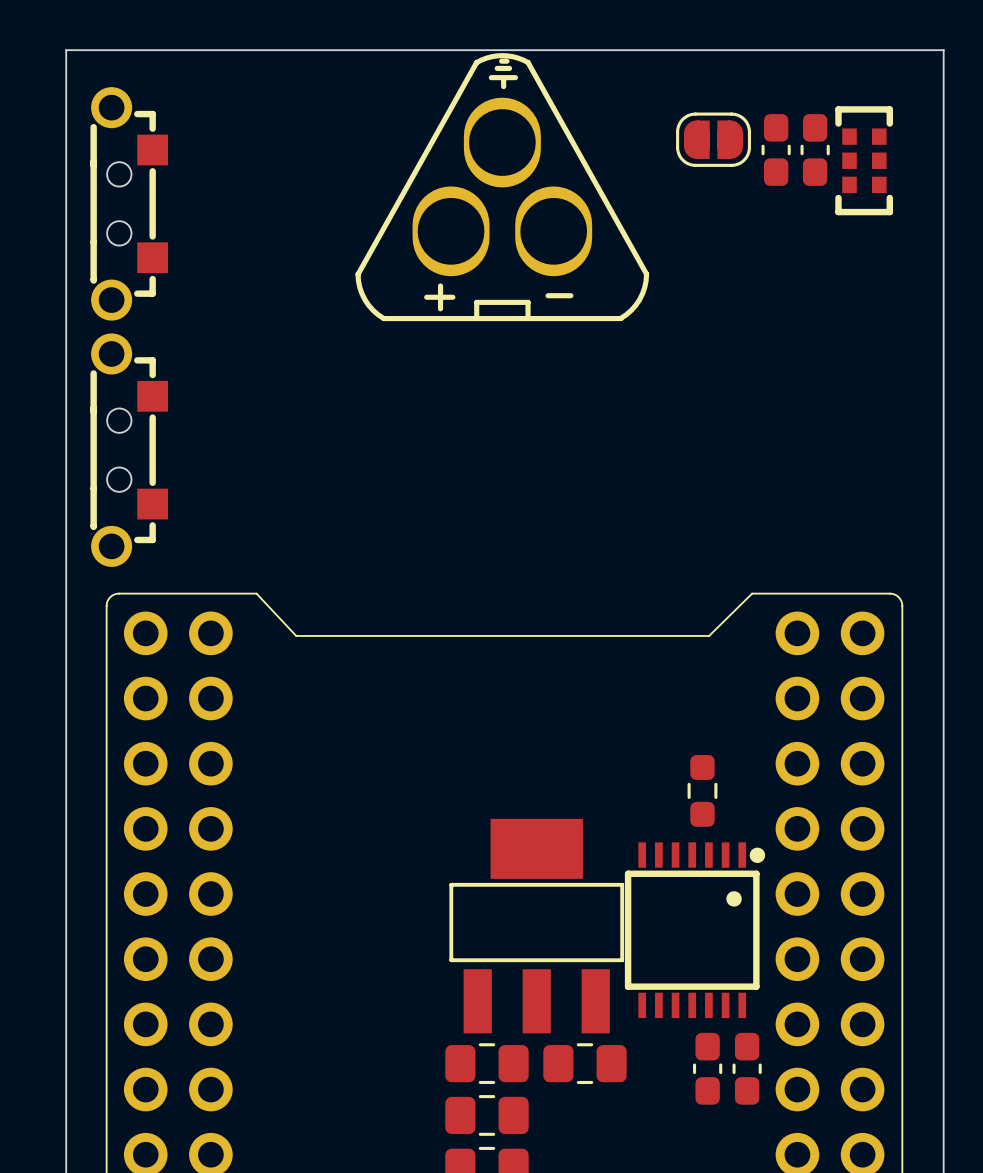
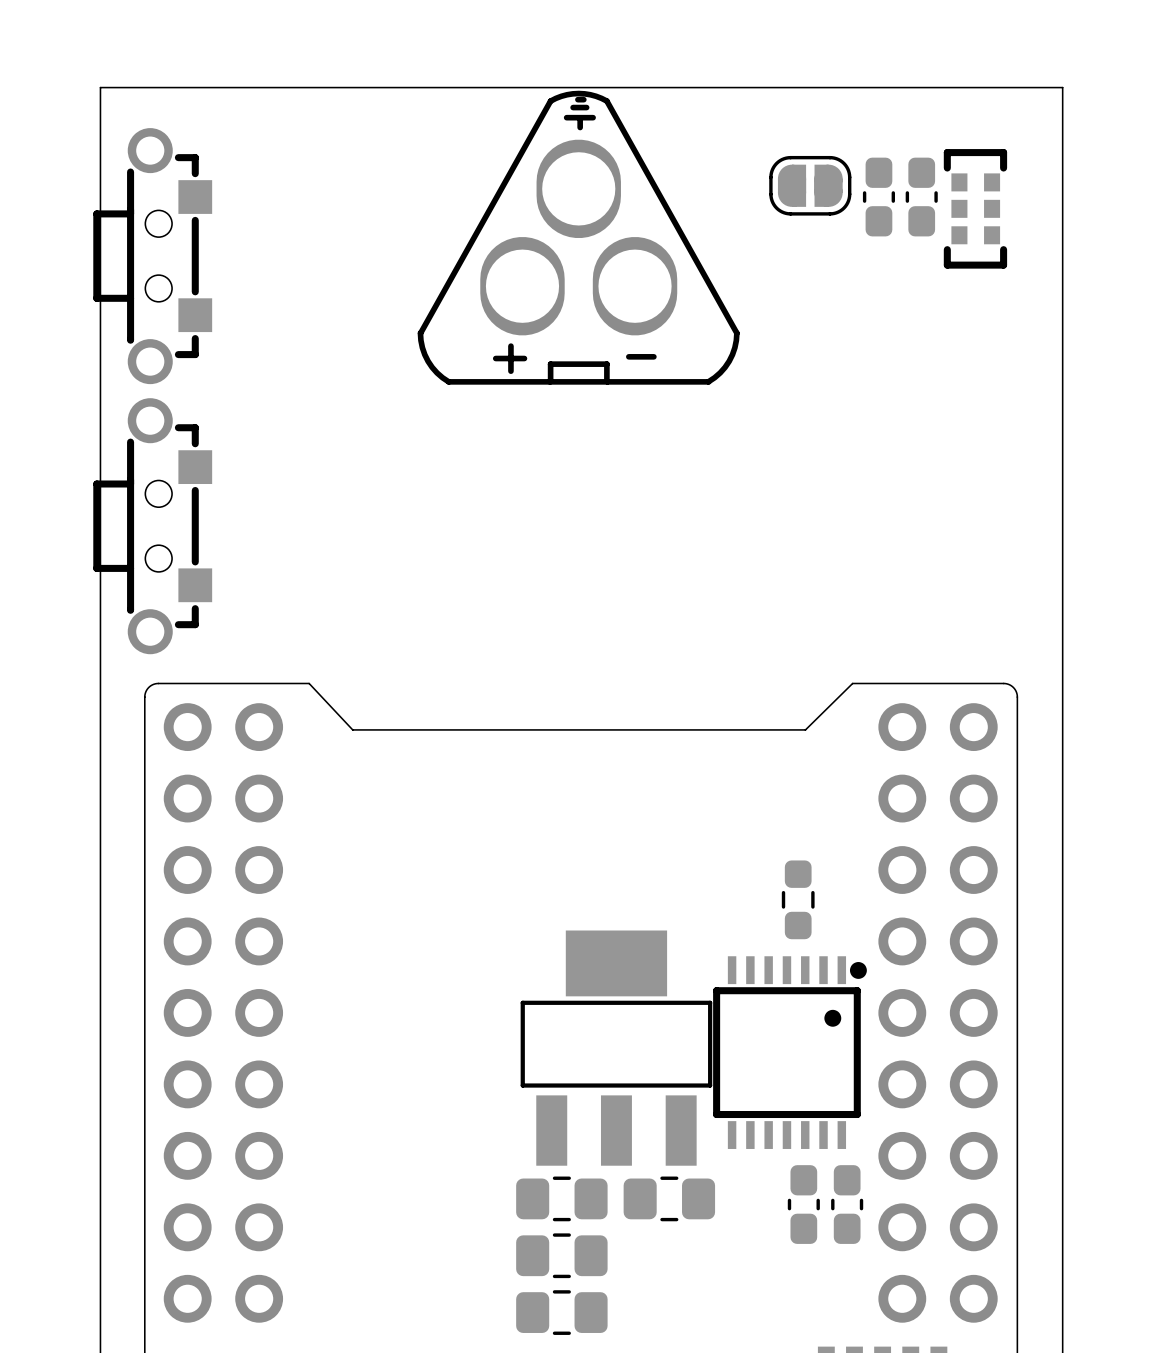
part footprint: [90, 87, 169, 321] -> [93, 128, 213, 385]
part footprint: [90, 333, 169, 567] -> [93, 398, 213, 655]

